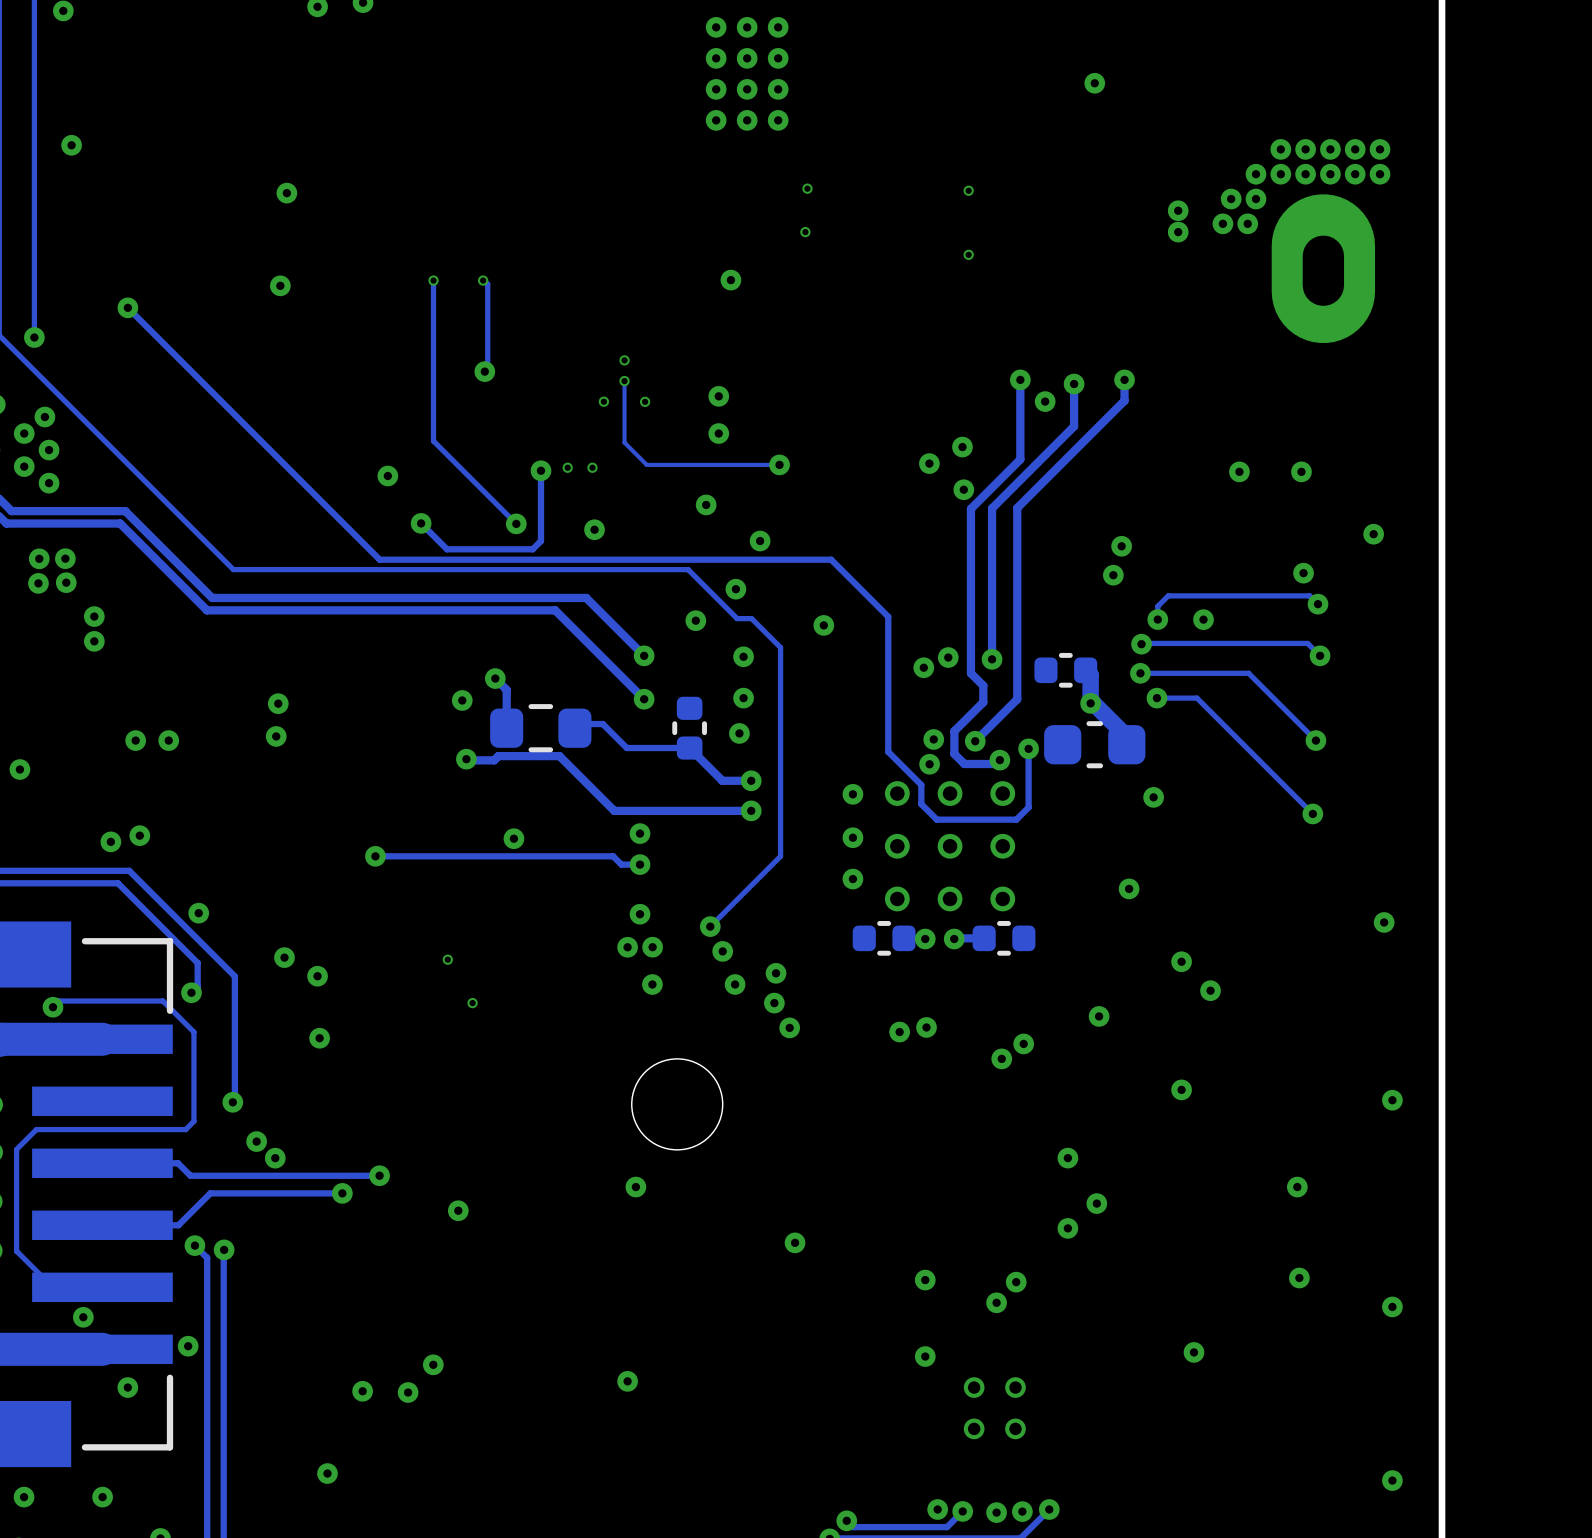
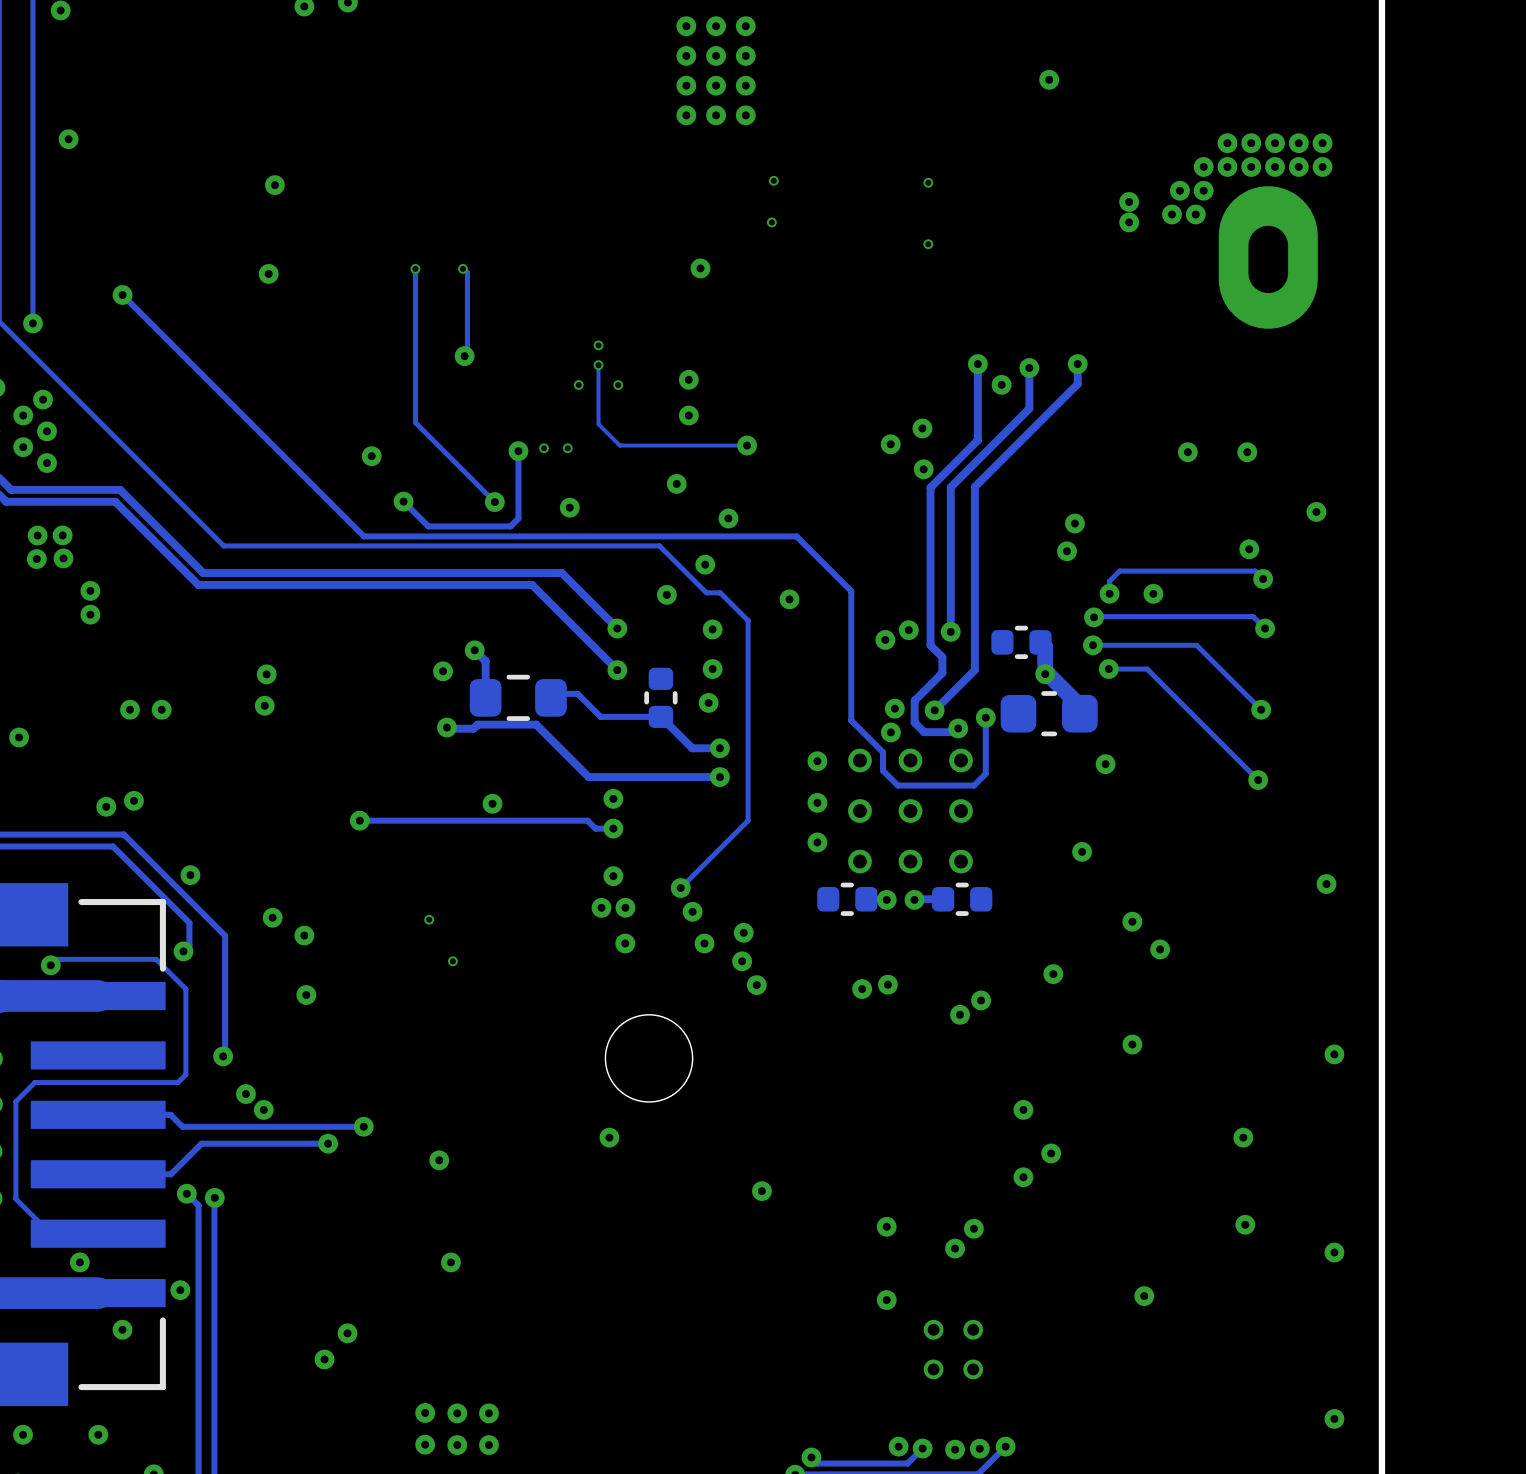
via: none -> (450, 1262)
via: (433, 1364) -> none
via: (627, 1381) -> none
via: (408, 1392) -> none
via: none -> (324, 1359)
via: (327, 1473) -> none
via: none -> (425, 1412)
via: none -> (457, 1413)
via: none -> (488, 1413)
via: none -> (425, 1444)
via: none -> (457, 1445)
via: none -> (488, 1445)

